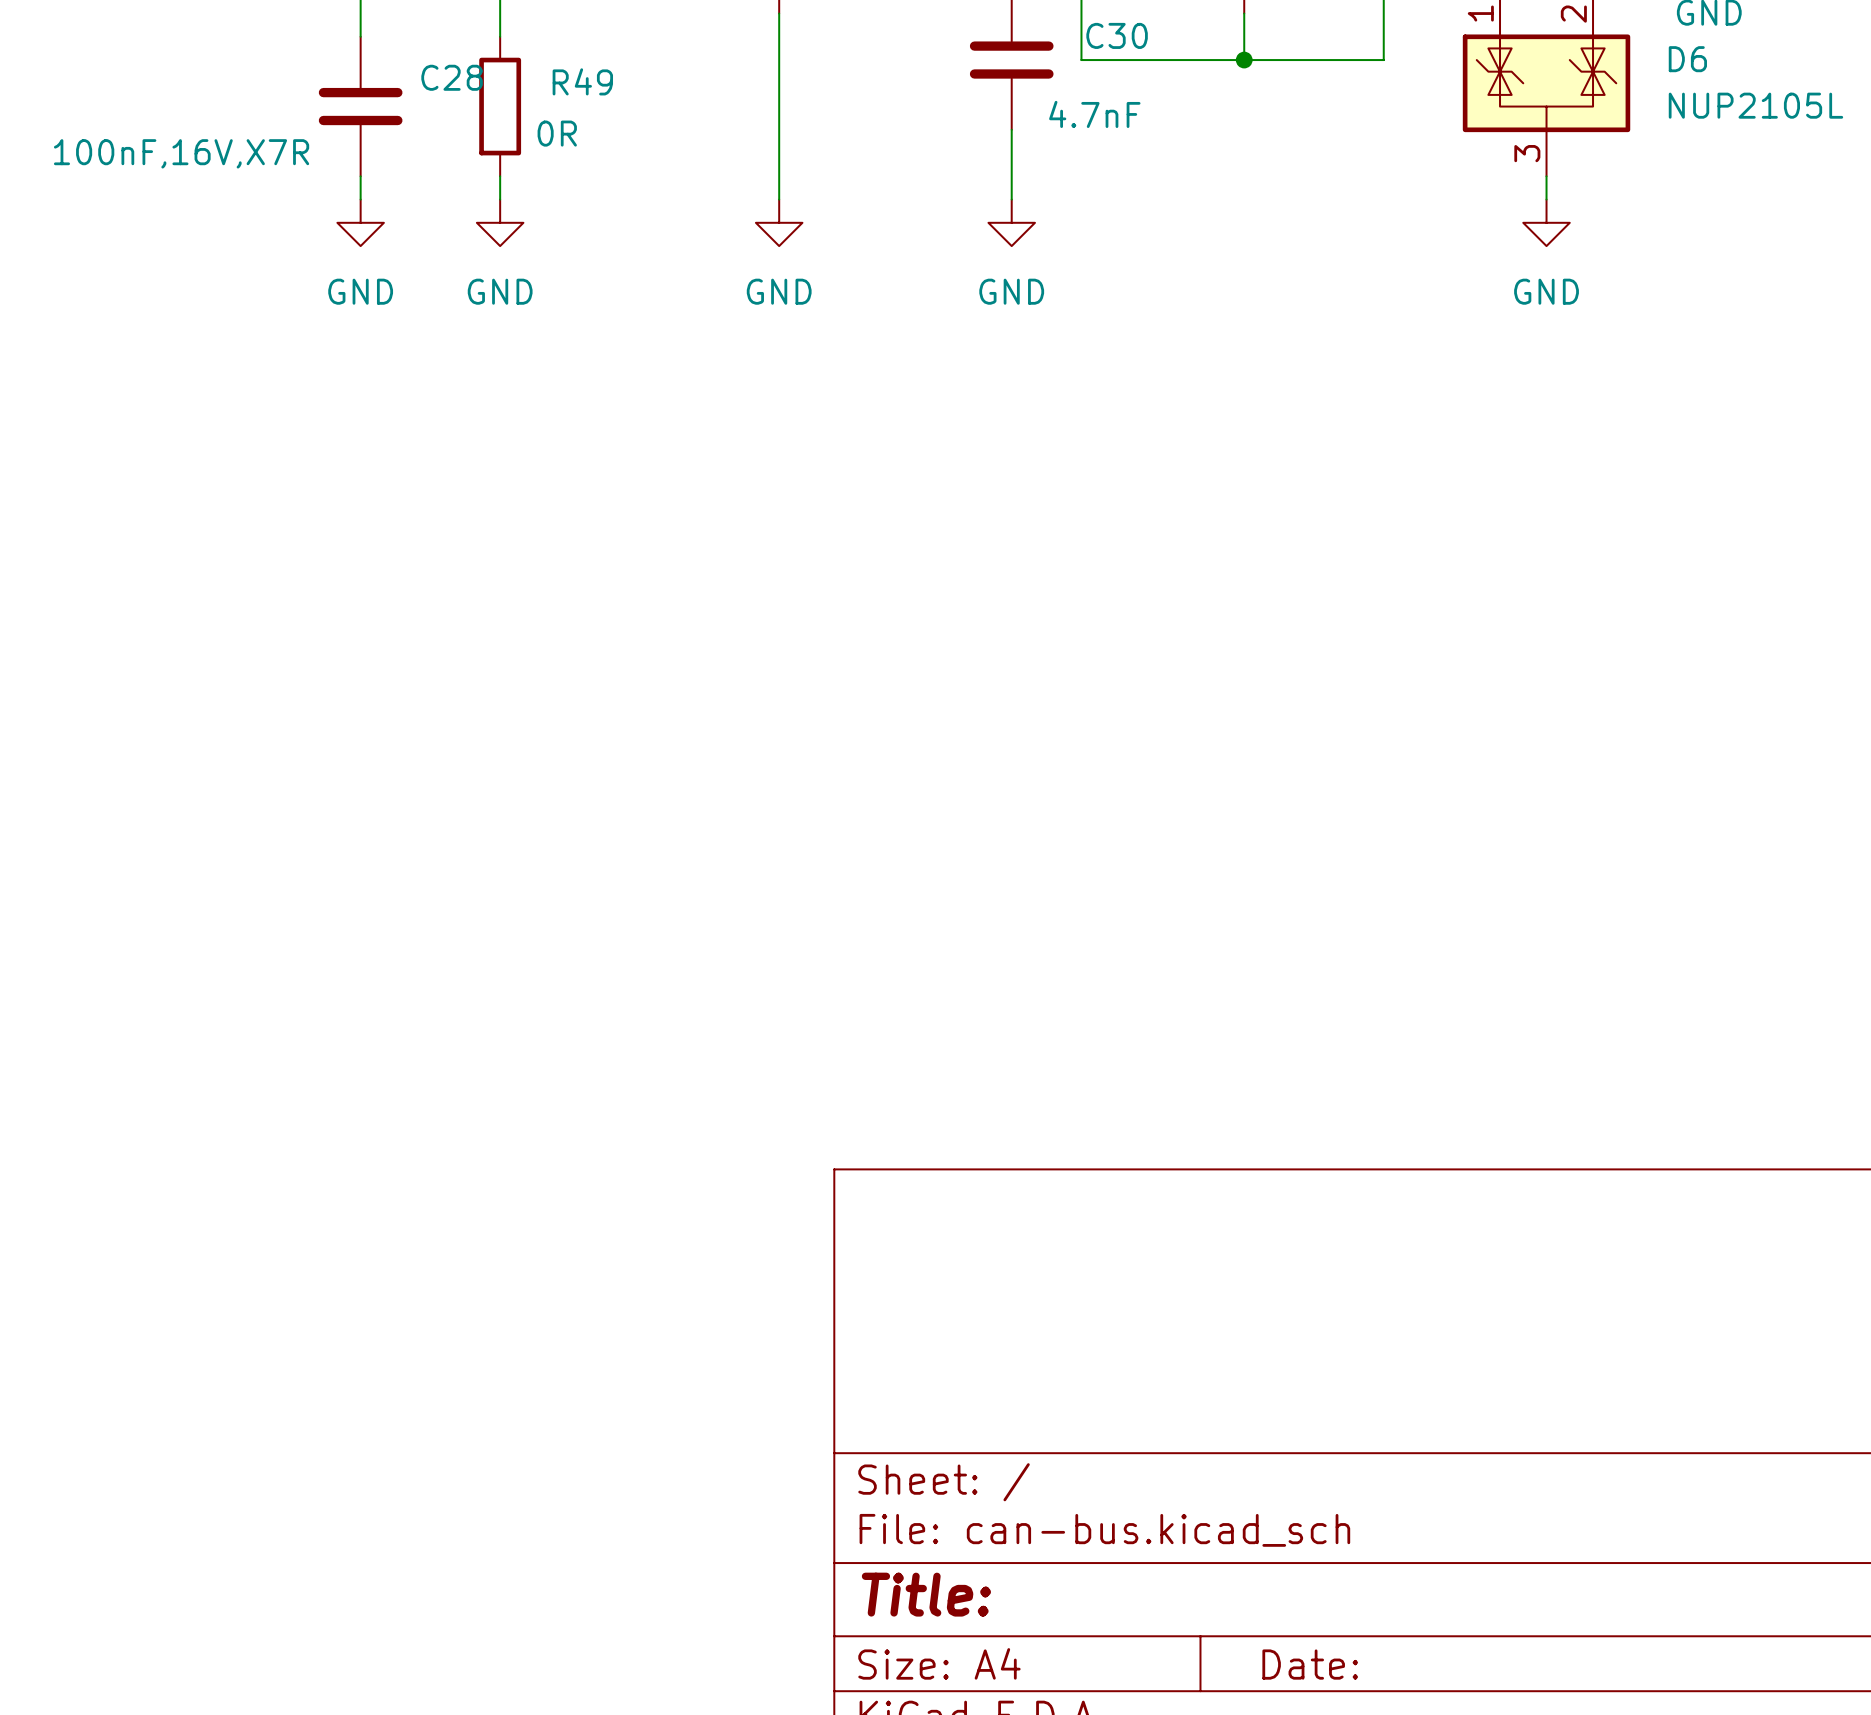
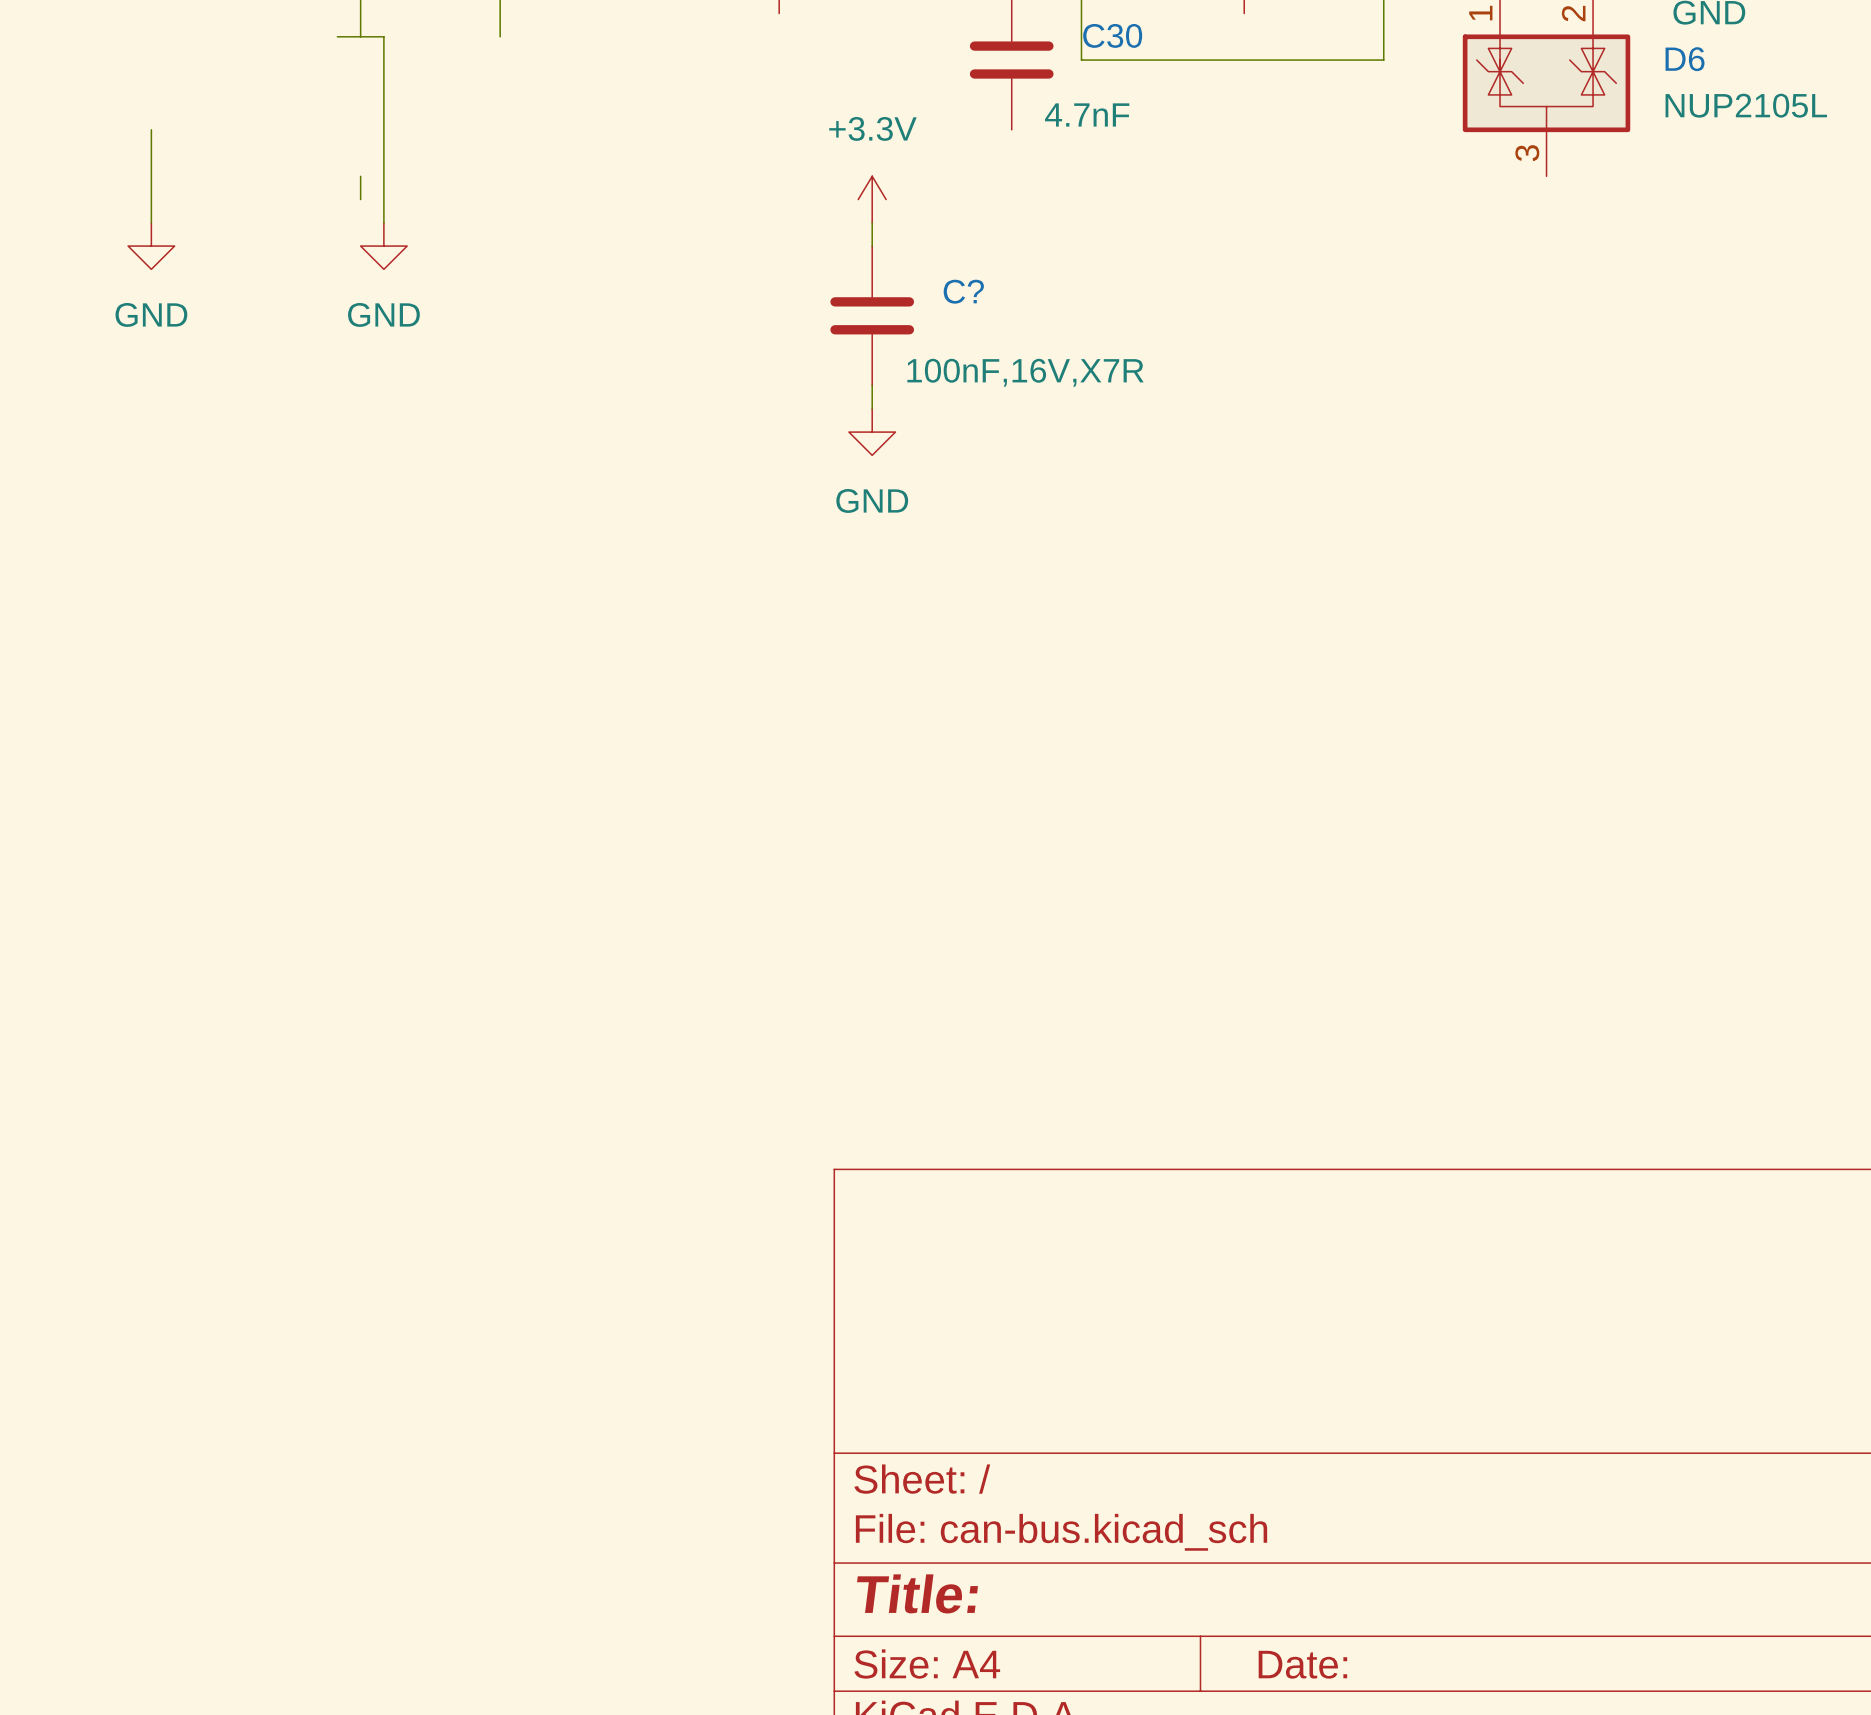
wire: (779, 13) (779, 199) -> none
wire: (1244, 13) (1244, 60) -> none
wire: none -> (337, 36) (383, 36) (383, 222)
junction: (1244, 60) -> none
C28: 100nF,16V,X7R (360, 106) -> none
R49: 0R (500, 106) -> none
wire: none -> (151, 129) (151, 222)
wire: (1011, 129) (1011, 199) -> none
wire: (500, 176) (500, 199) -> (872, 222) (872, 246)
wire: (1546, 176) (1546, 199) -> none
power symbol: none -> +3.3V (872, 199)
power symbol position: GND (360, 222) -> GND (383, 246)
power symbol: GND (500, 222) -> none
power symbol: GND (779, 222) -> none
power symbol: GND (1011, 222) -> none
power symbol: GND (1546, 222) -> none
power symbol: none -> GND (151, 246)
C?: none -> 100nF,16V,X7R (872, 315)
wire: none -> (872, 385) (872, 408)
power symbol: none -> GND (872, 432)

